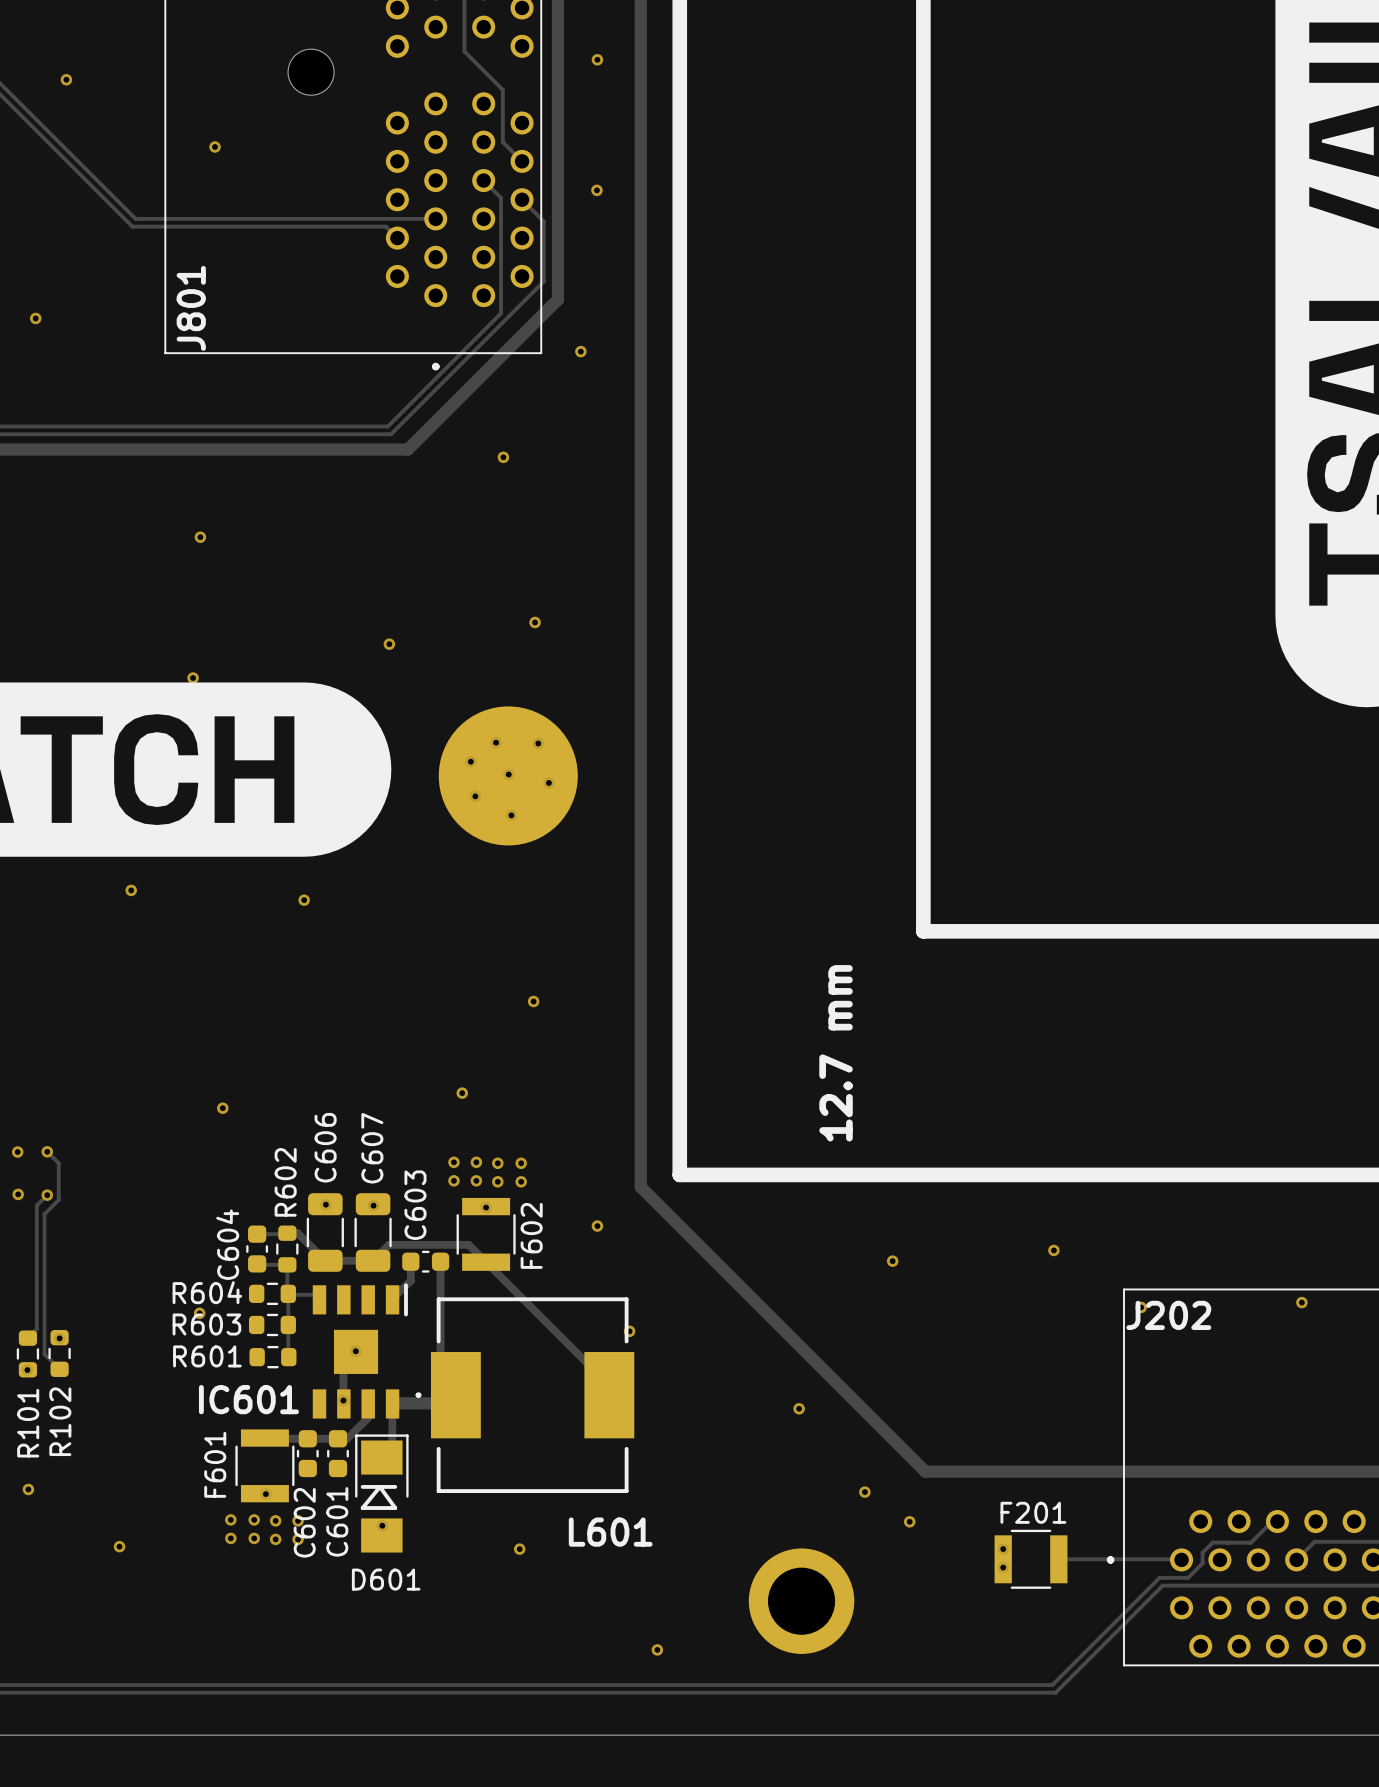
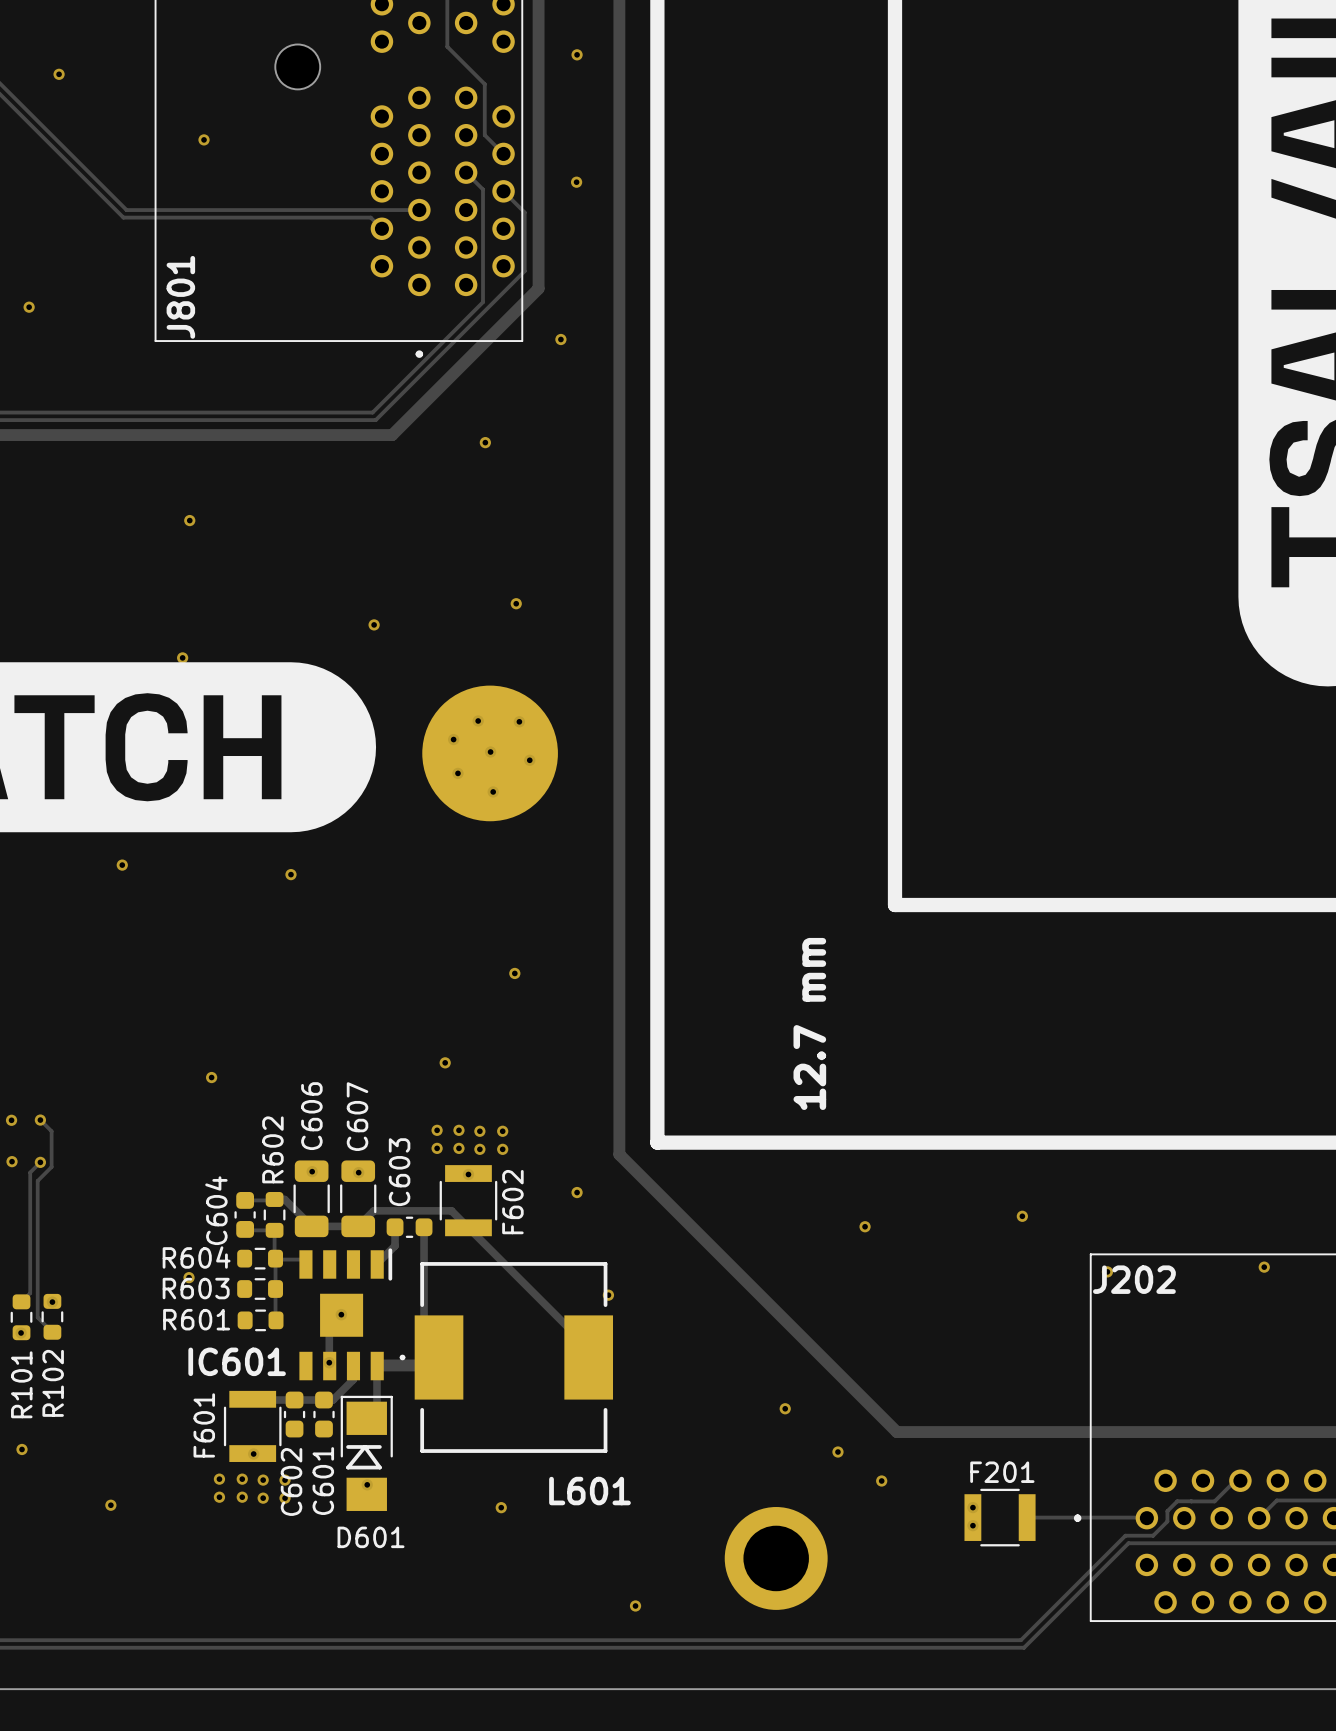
via position: (799, 1408) -> (785, 1408)

